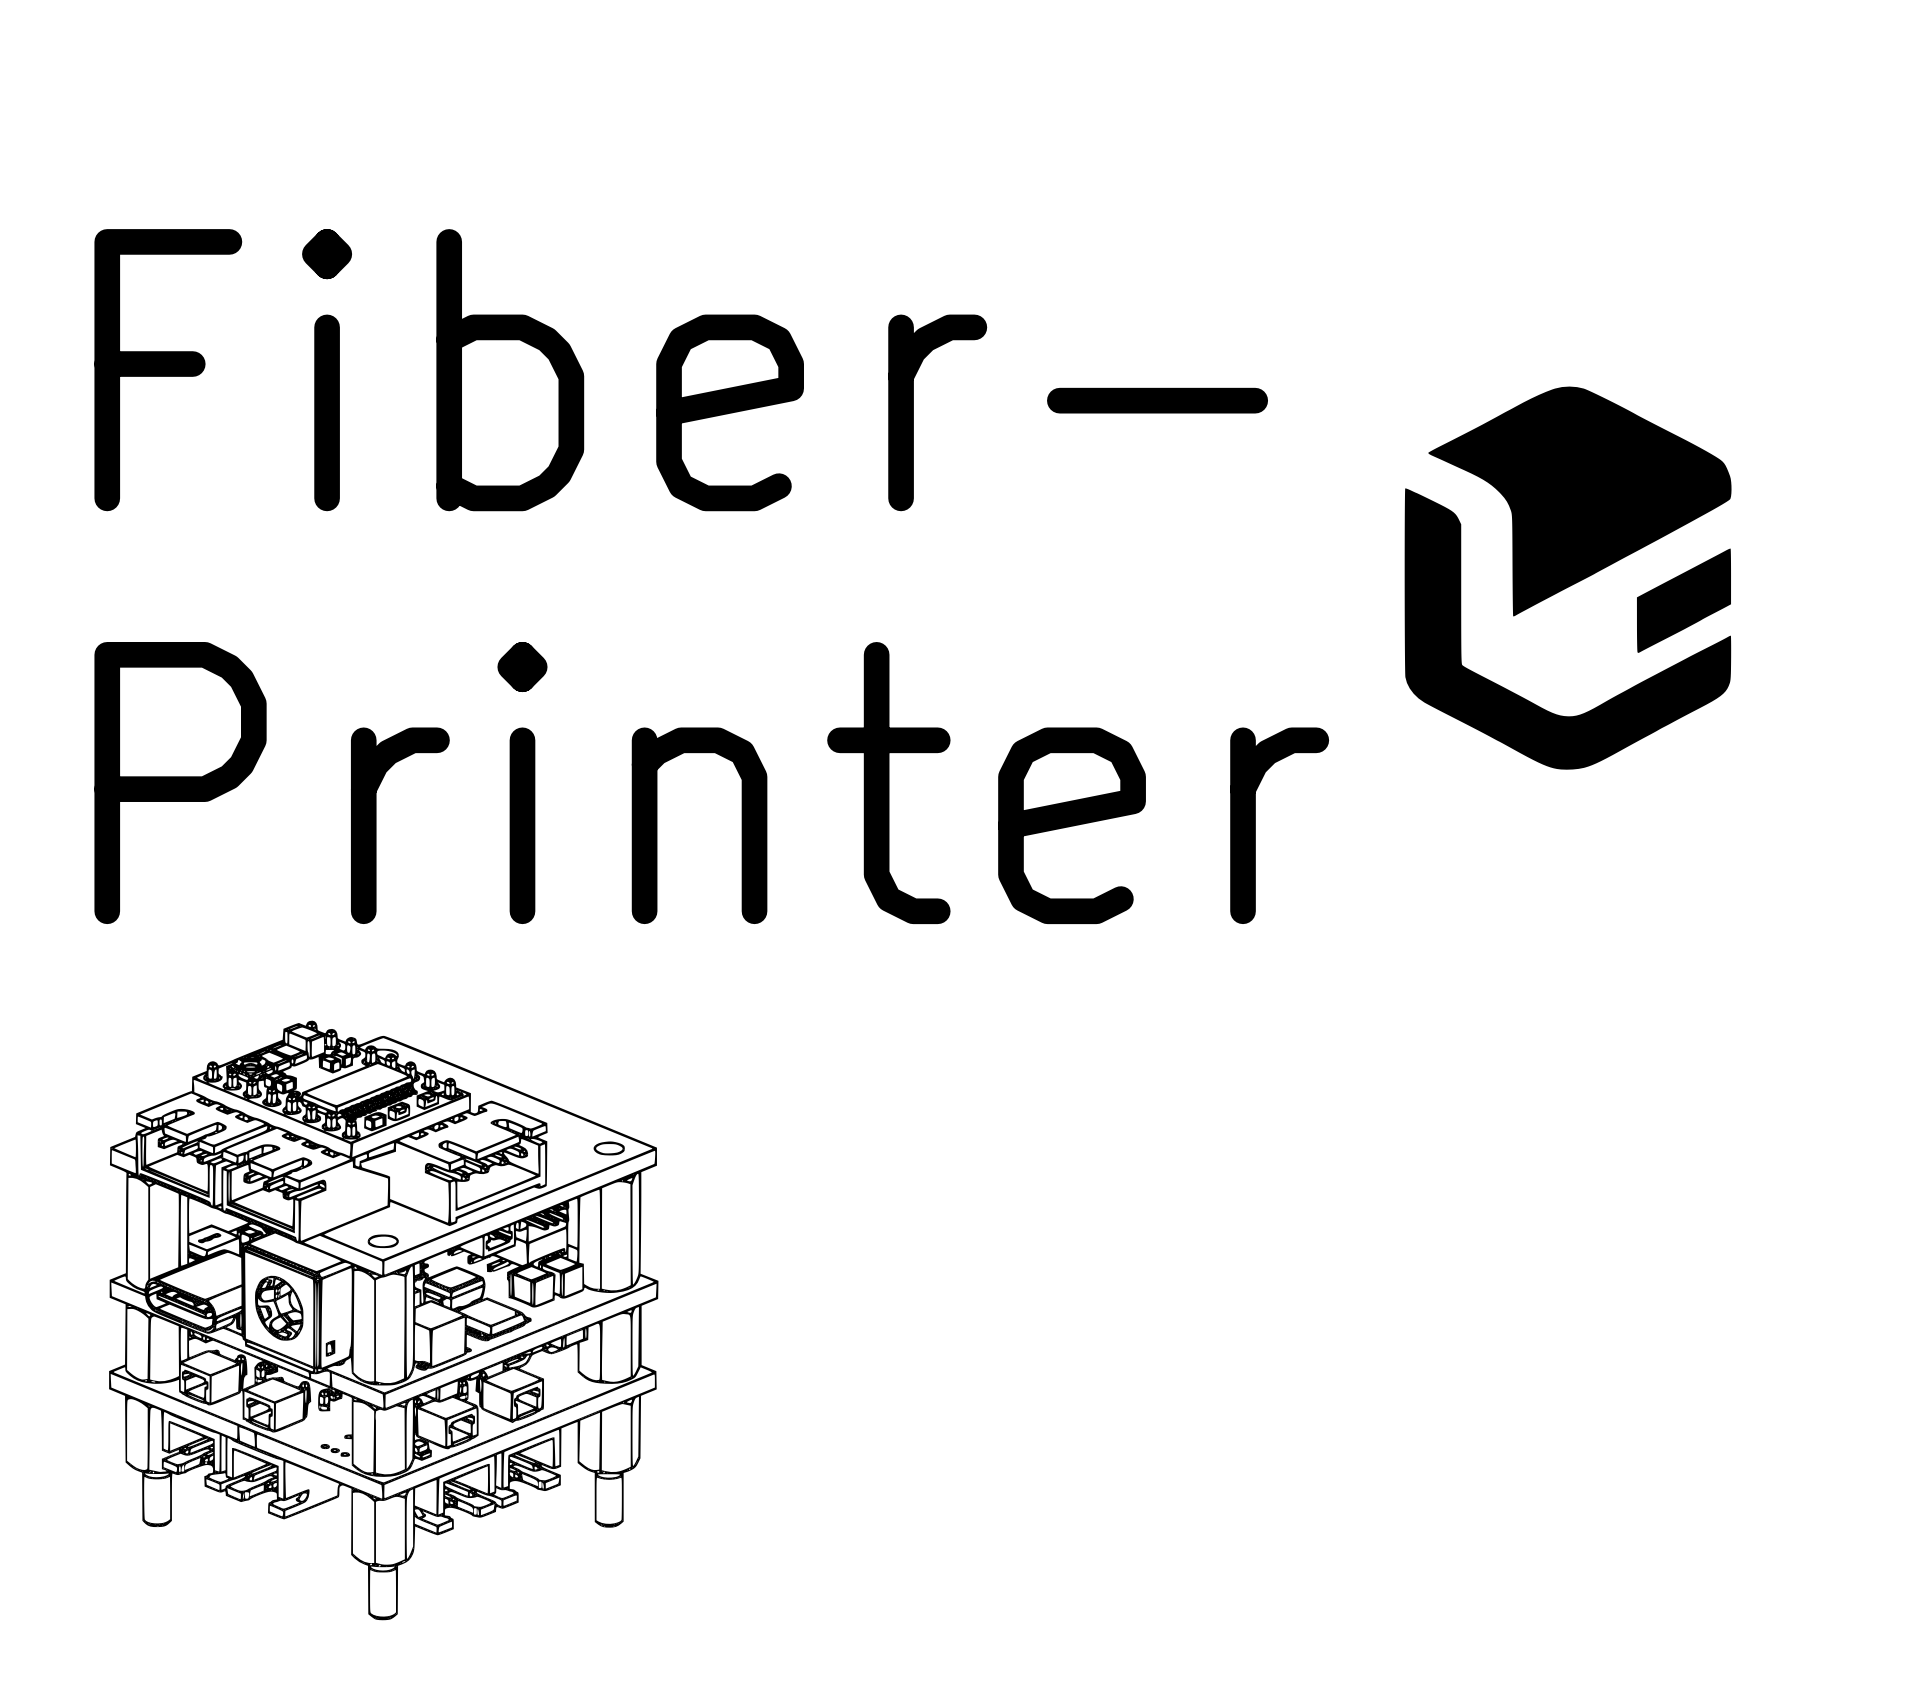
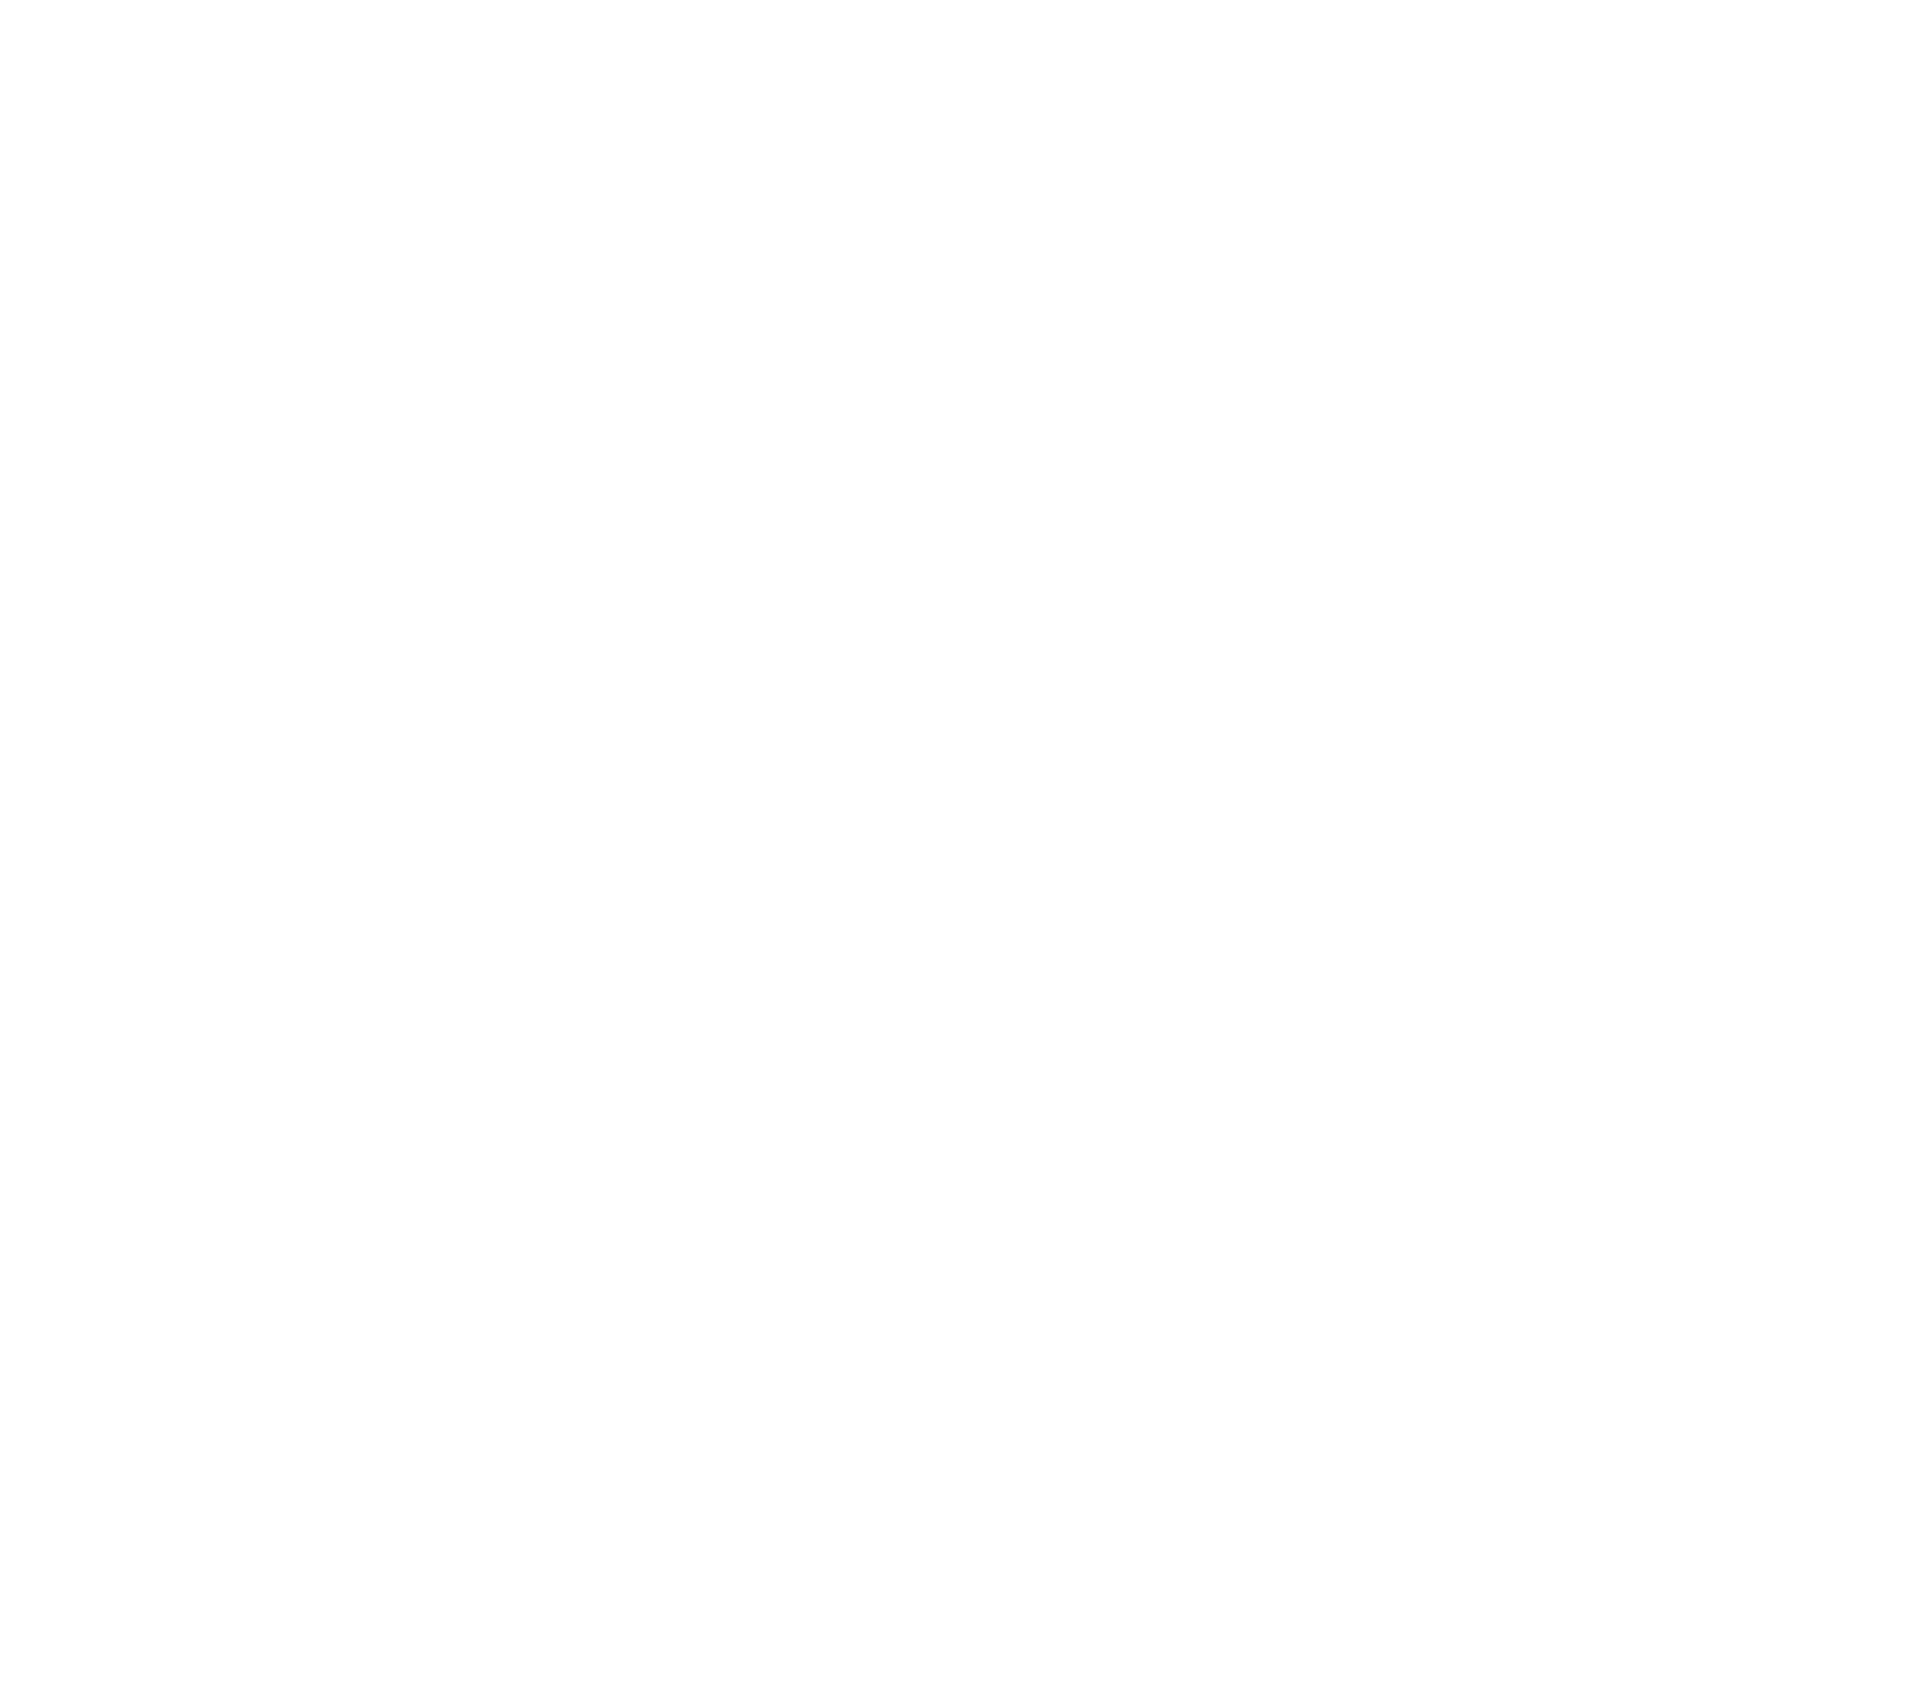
text: Fiber- (681, 370) -> none
drawing: [1404, 386, 1732, 770] -> none
text: Printer (711, 783) -> none
drawing: [109, 1020, 659, 1621] -> none

